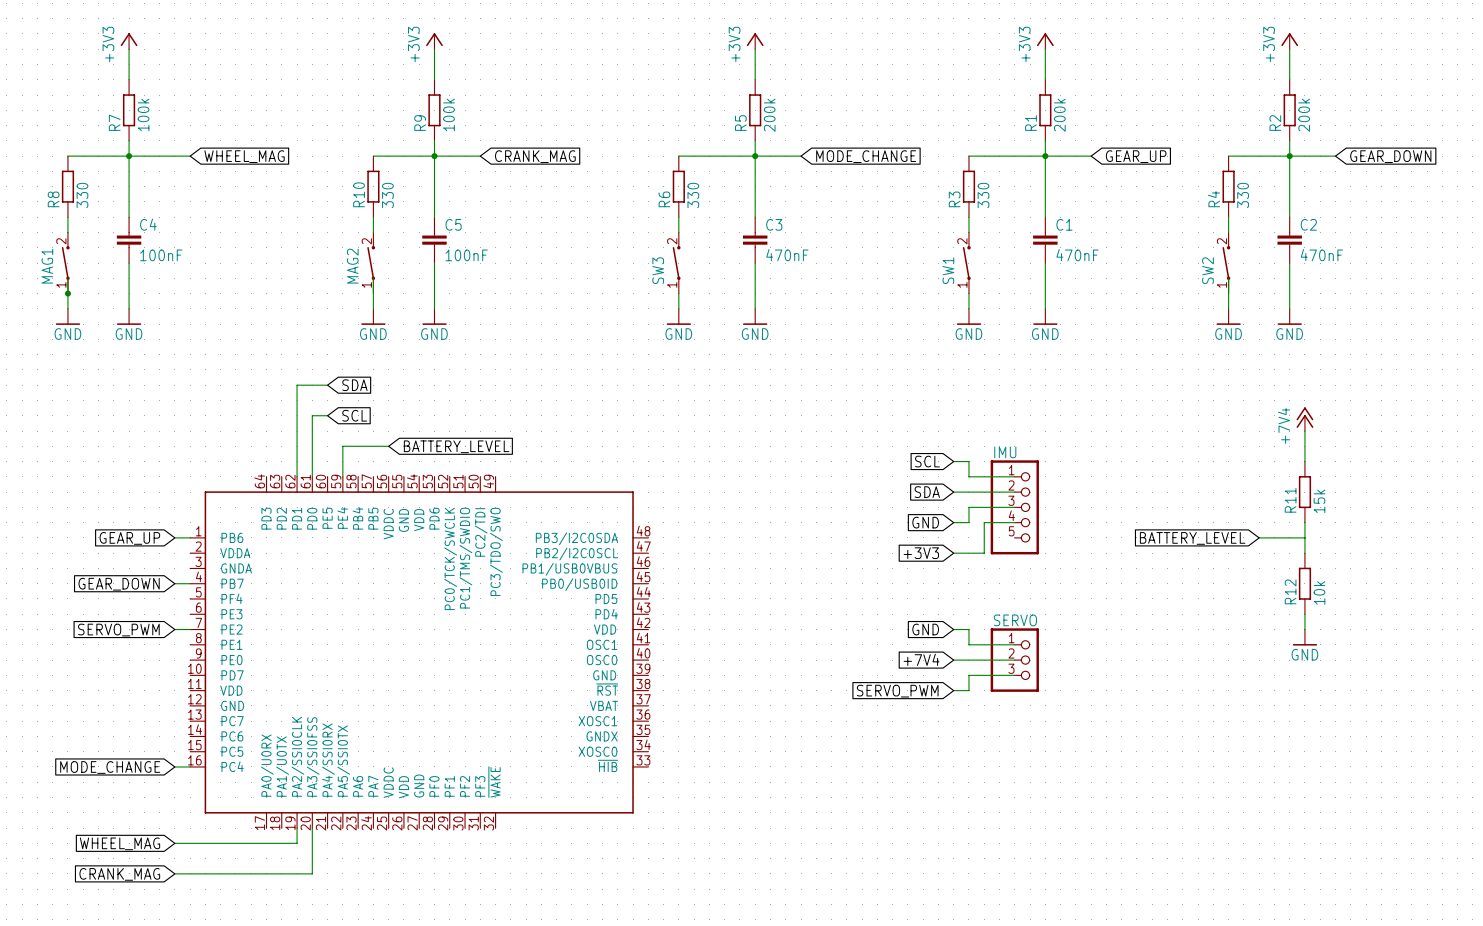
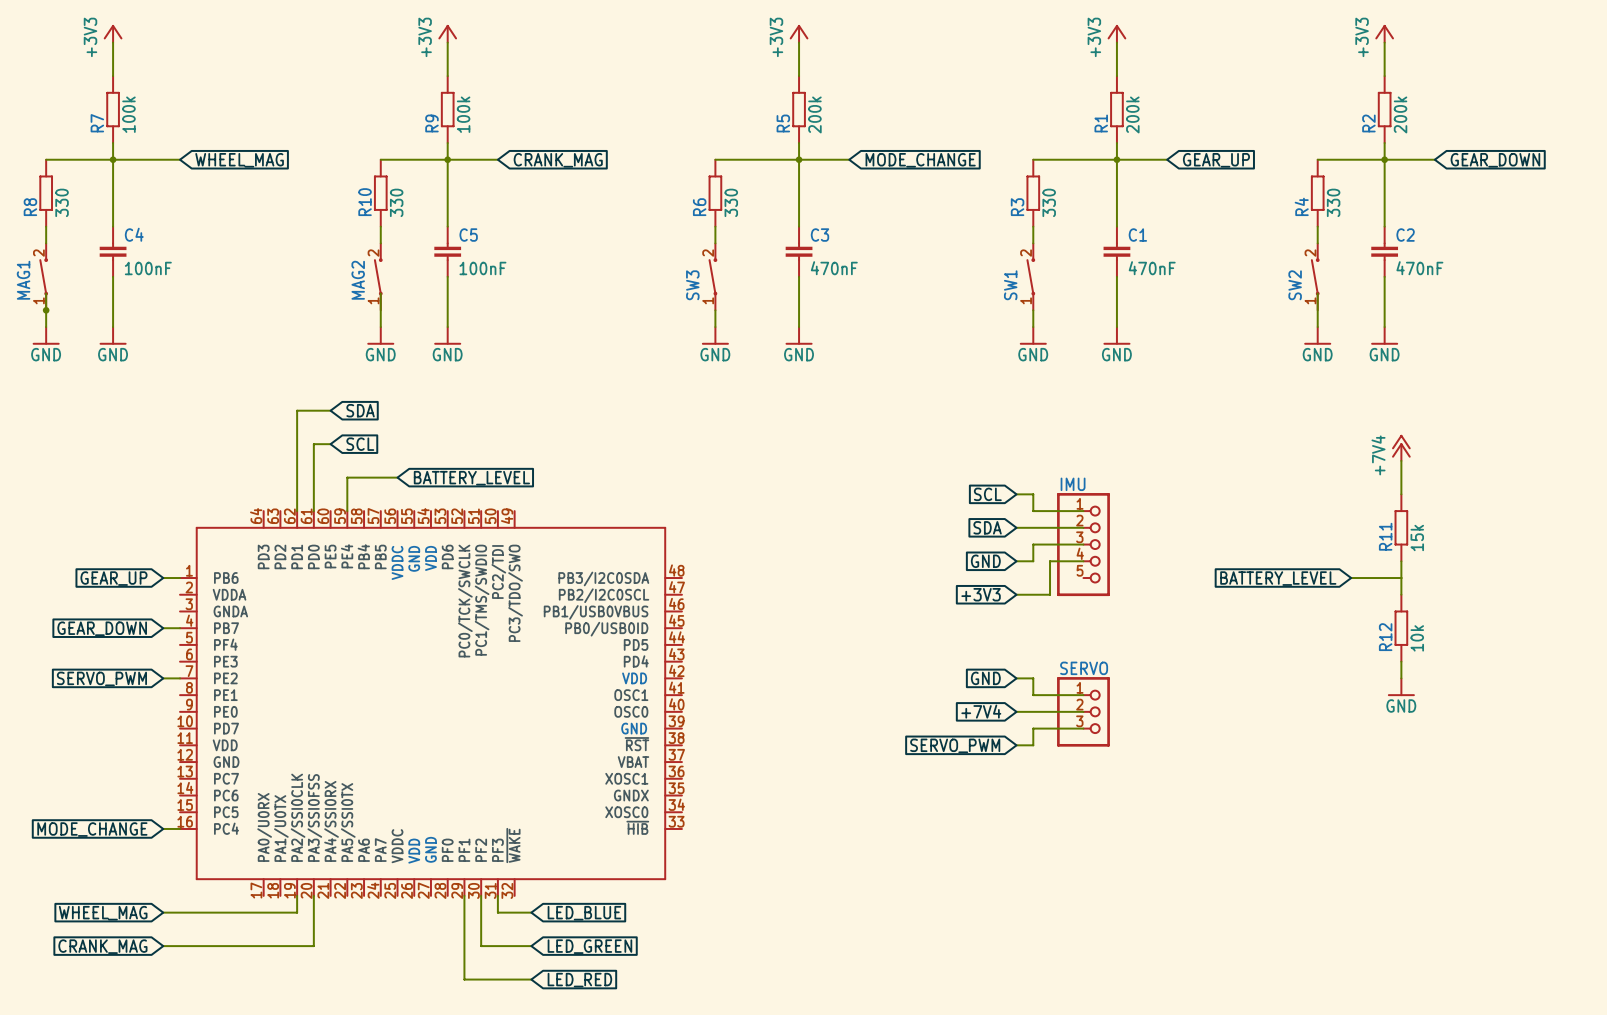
wire: none -> (464, 895) (464, 979) (531, 979)
wire: none -> (481, 895) (481, 946) (531, 946)
wire: none -> (497, 895) (497, 912) (531, 912)
global label: none -> LED_BLUE (584, 913)
global label: none -> LED_GREEN (589, 946)
global label: none -> LED_RED (579, 980)

